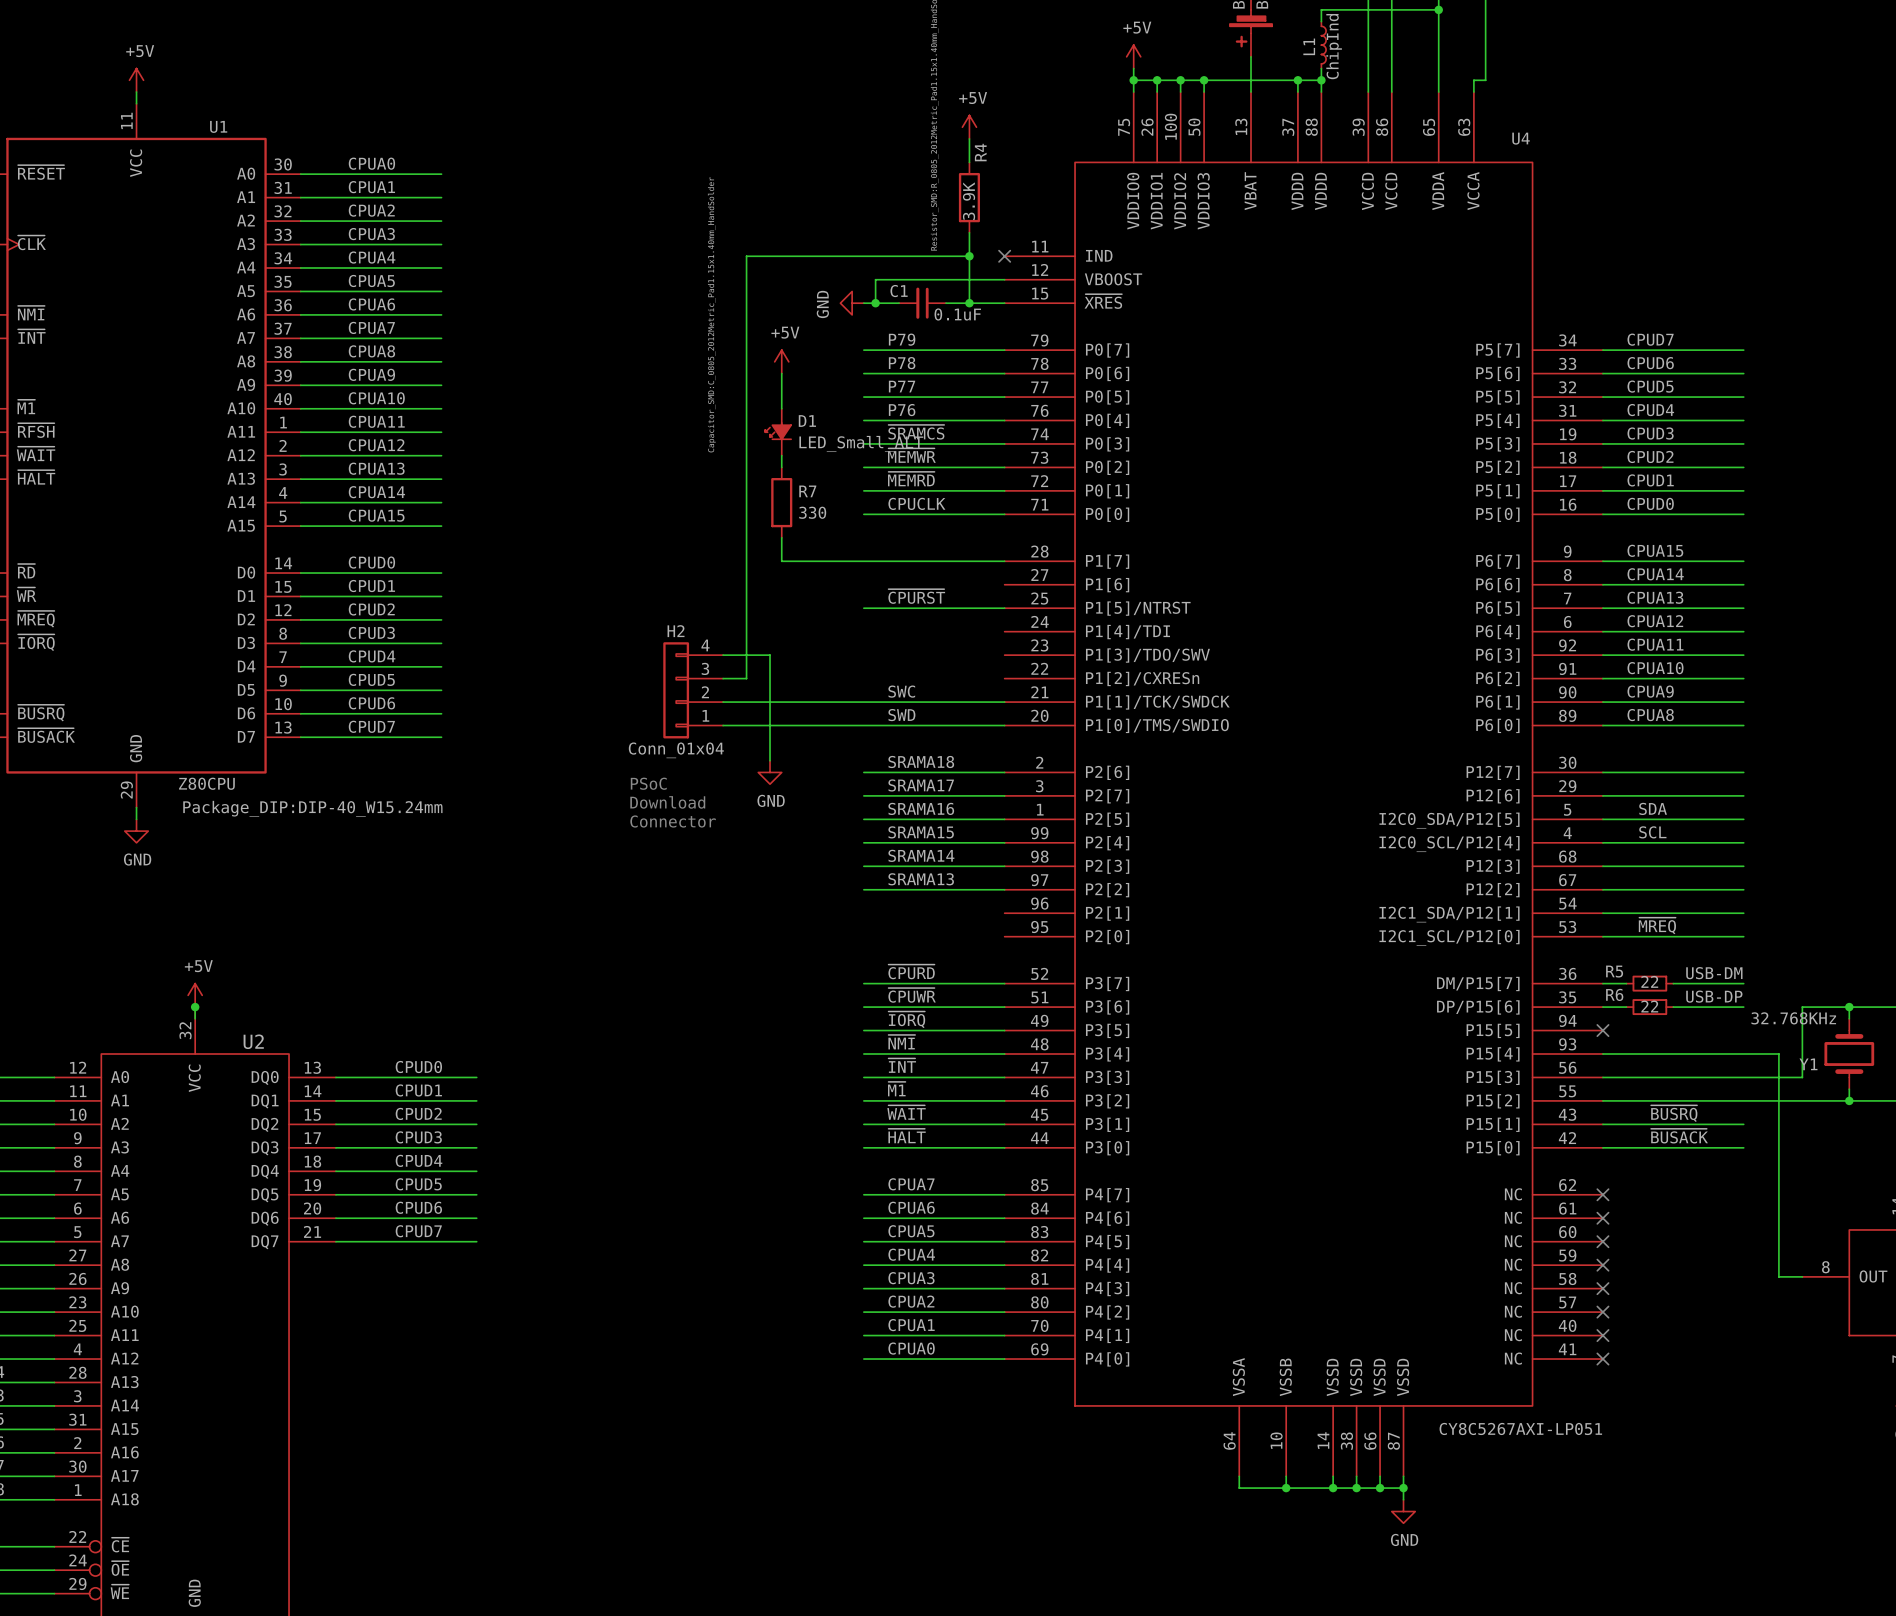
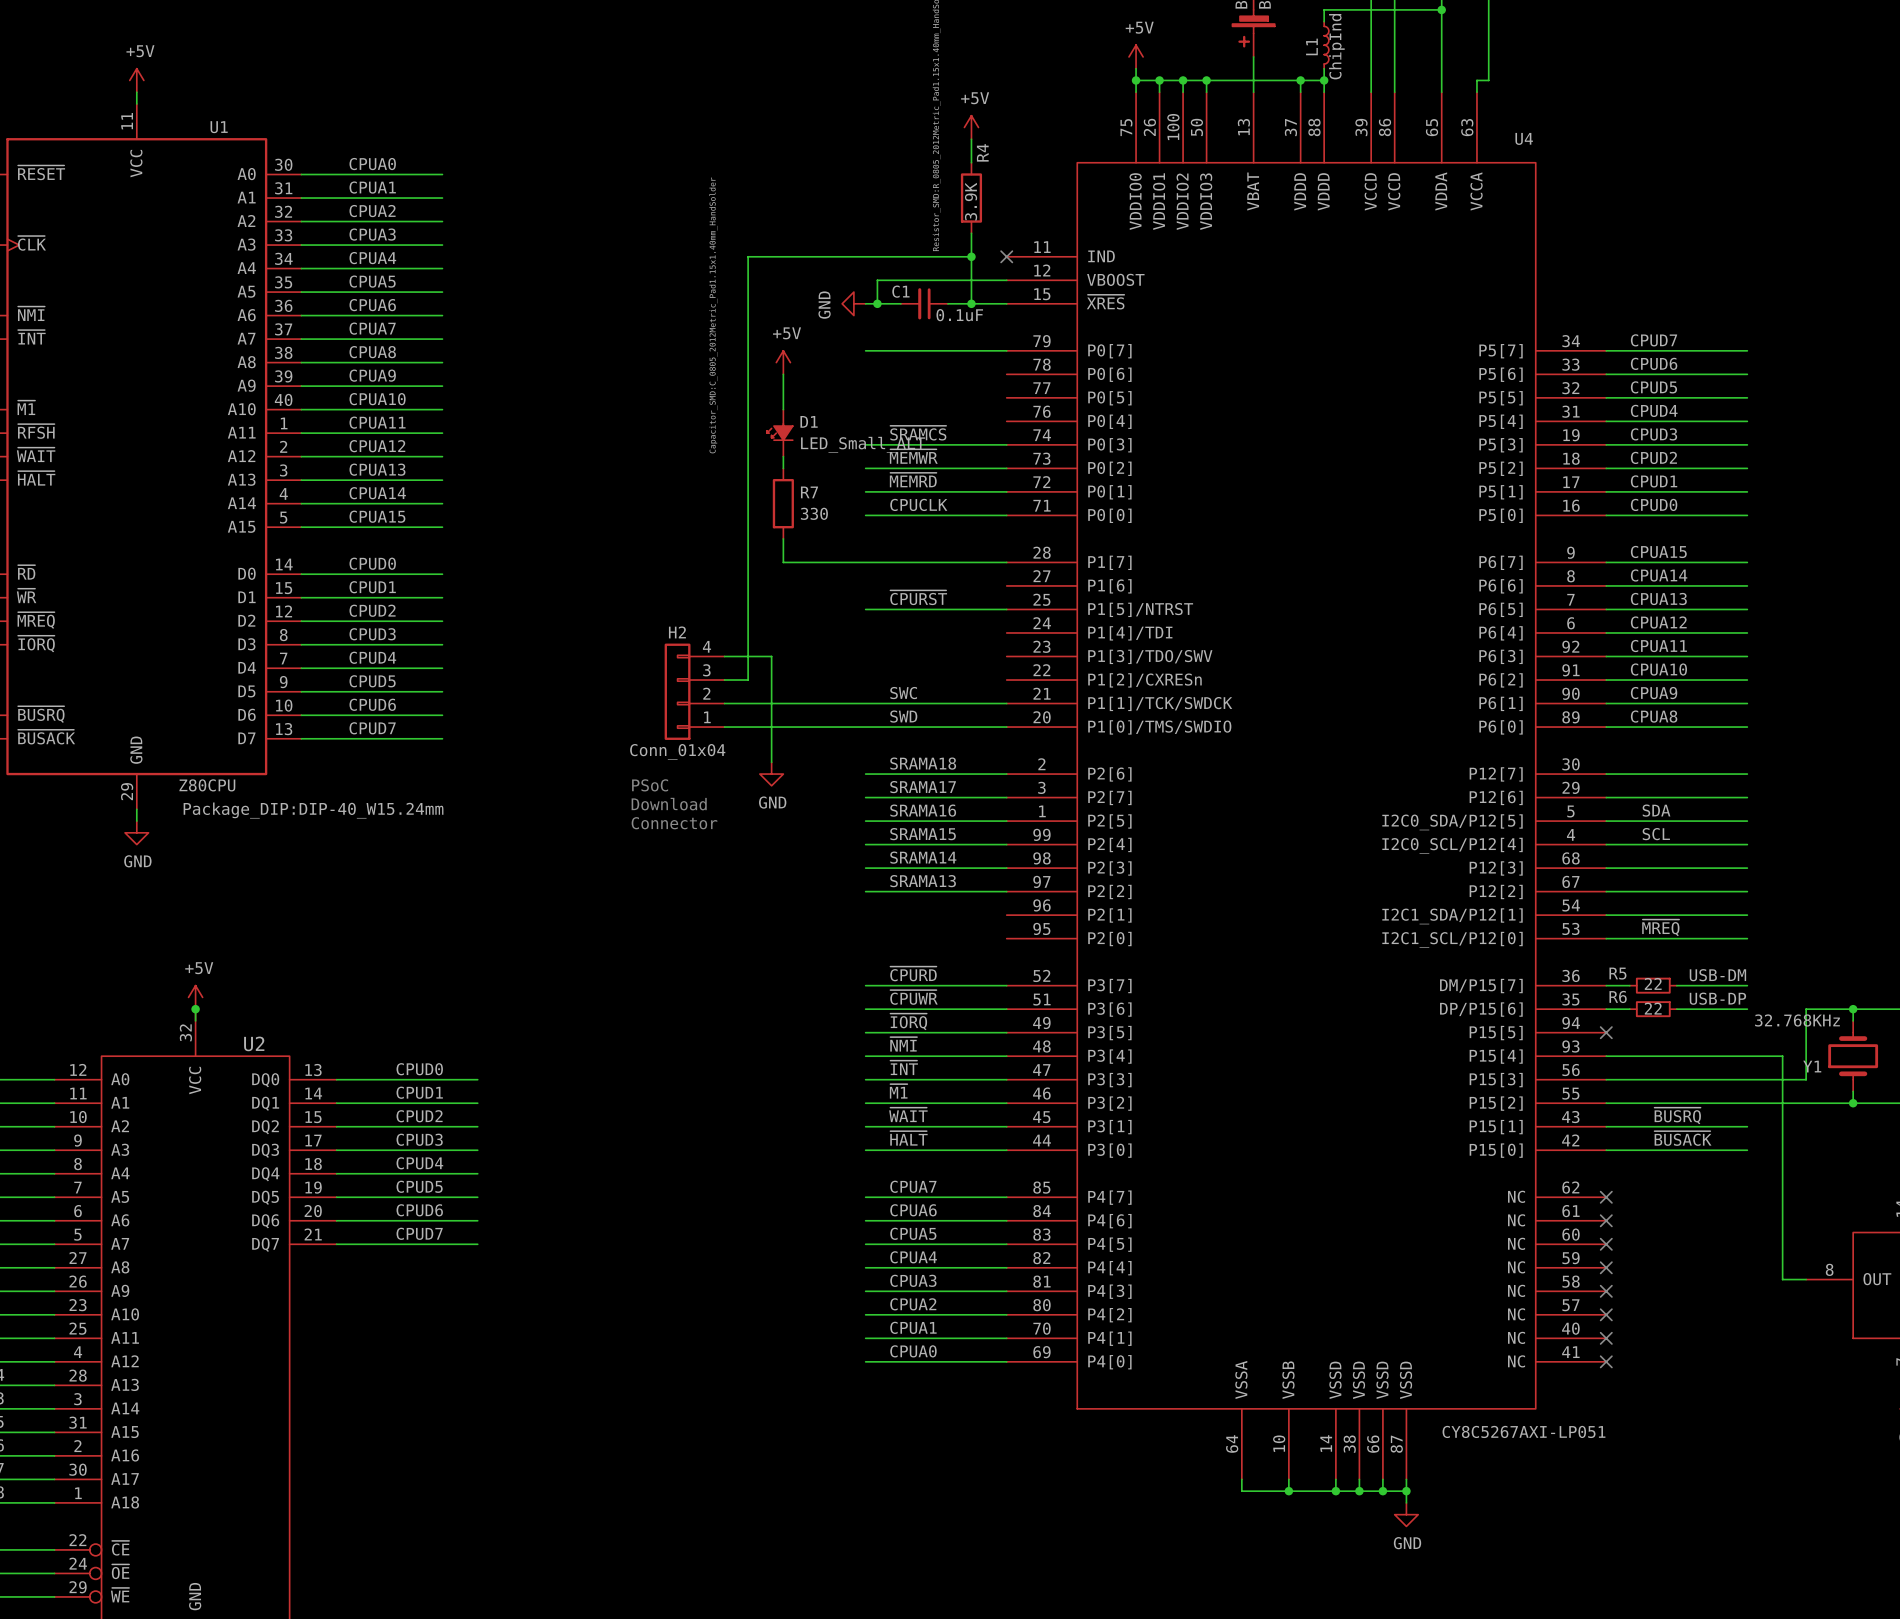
label: P79 (902, 339) -> none
label: P78 (902, 363) -> none
wire: (863, 373) (1004, 373) -> none
label: P77 (902, 386) -> none
wire: (863, 397) (1004, 397) -> none
label: P76 (902, 410) -> none
wire: (863, 420) (1004, 420) -> none

